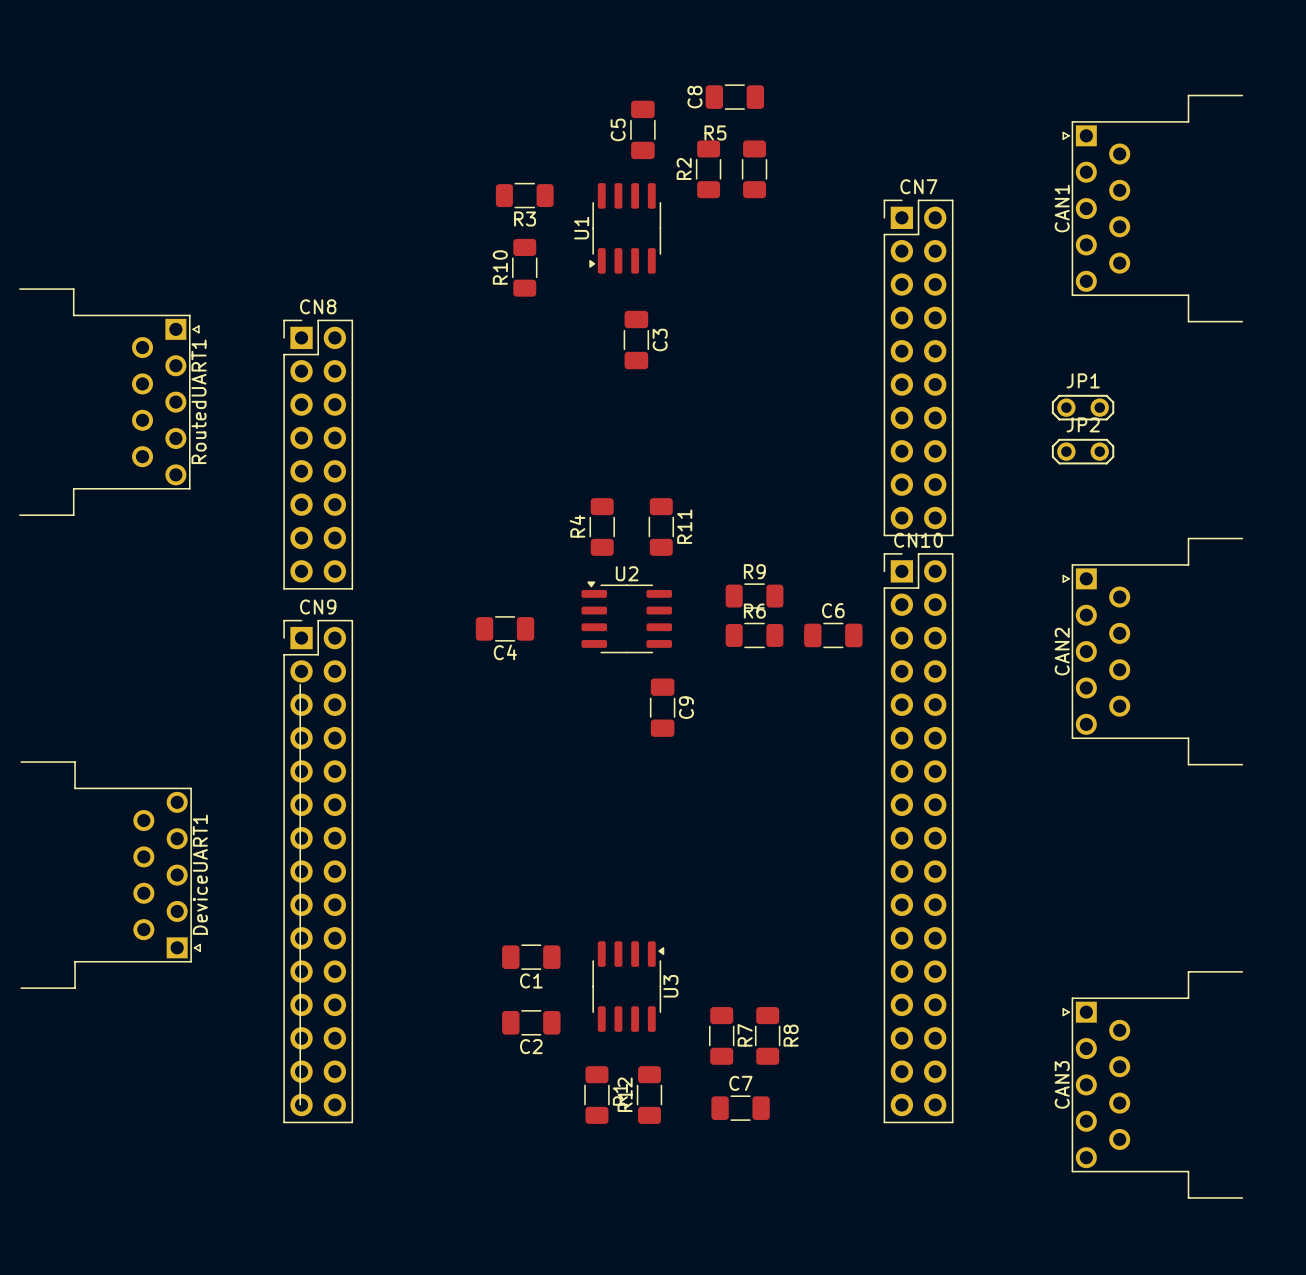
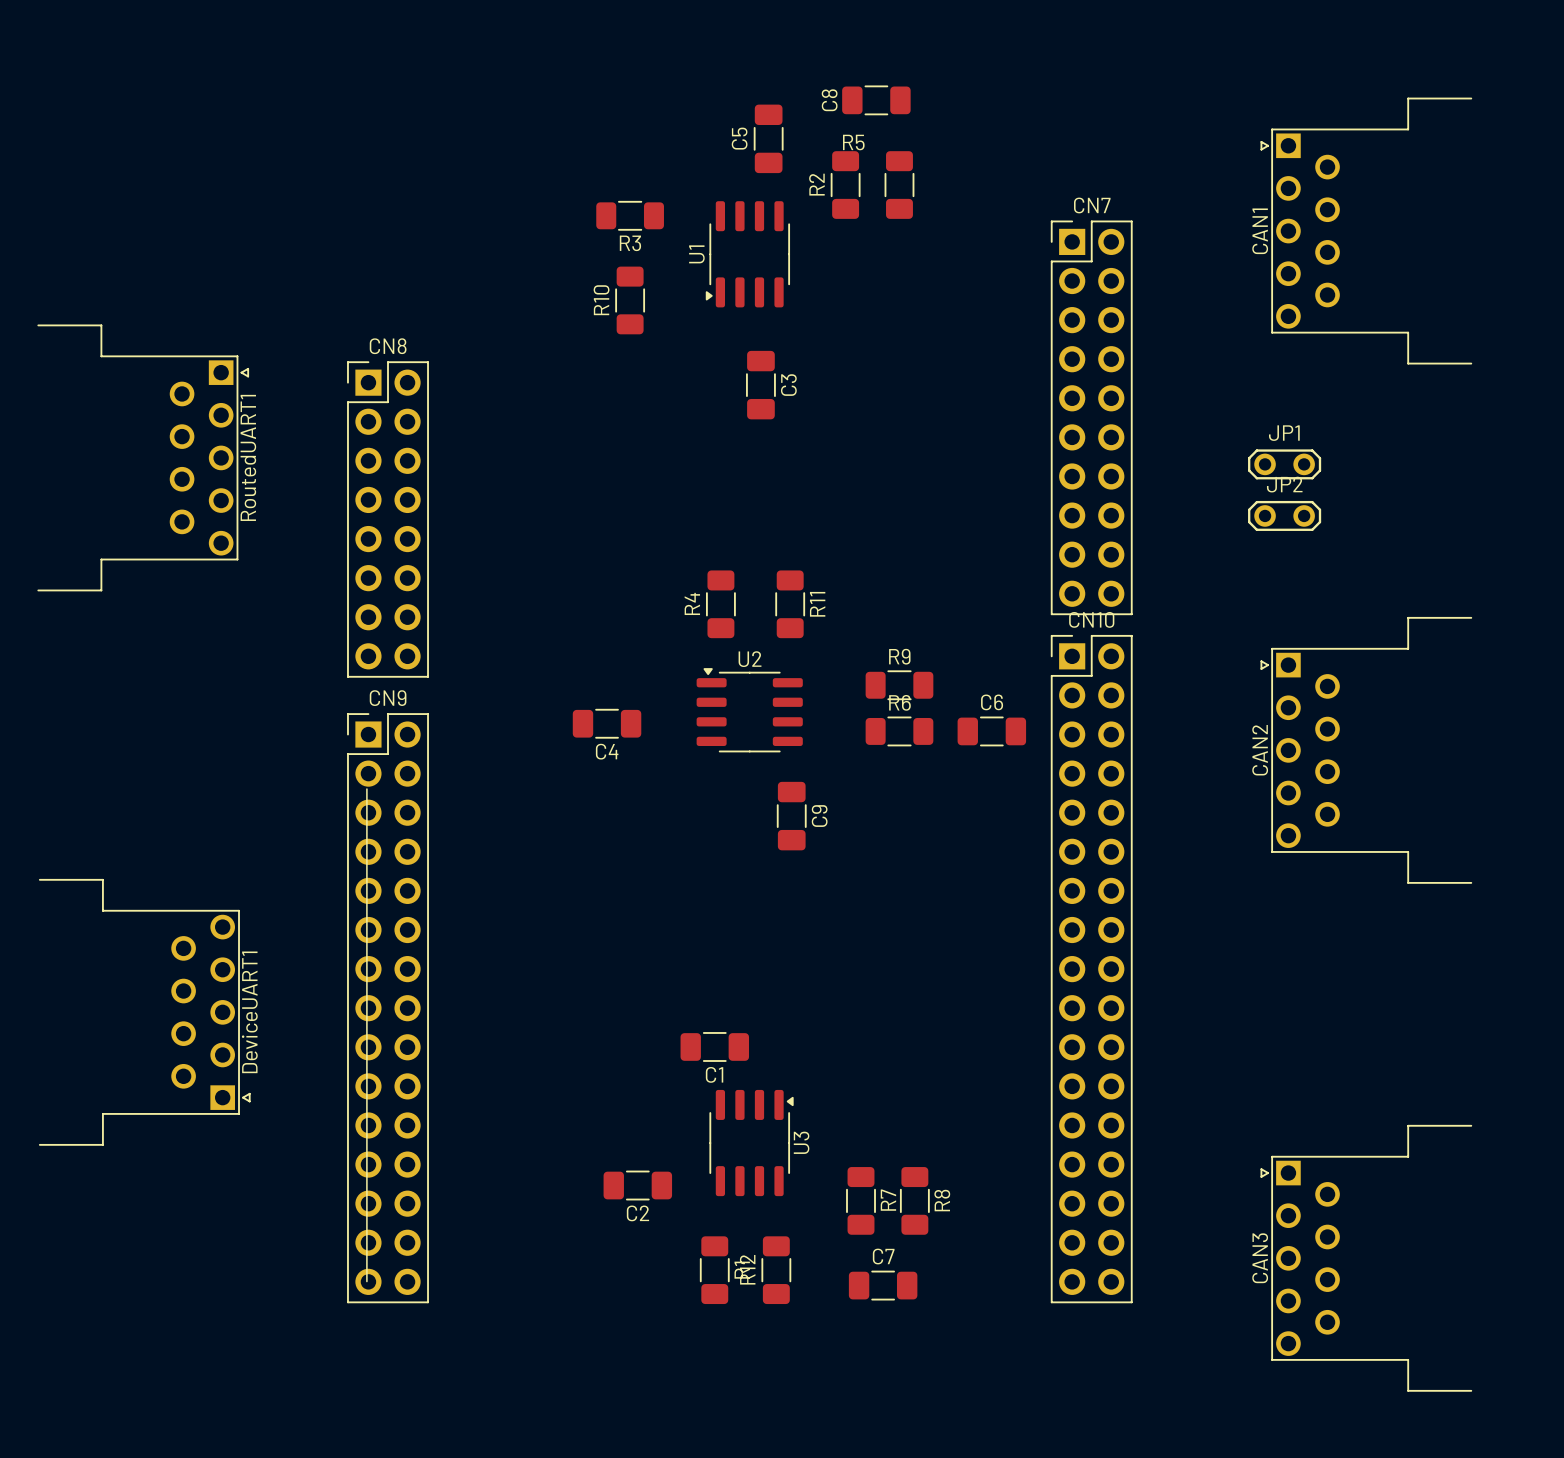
C1 position: (531, 957) -> (714, 1046)

